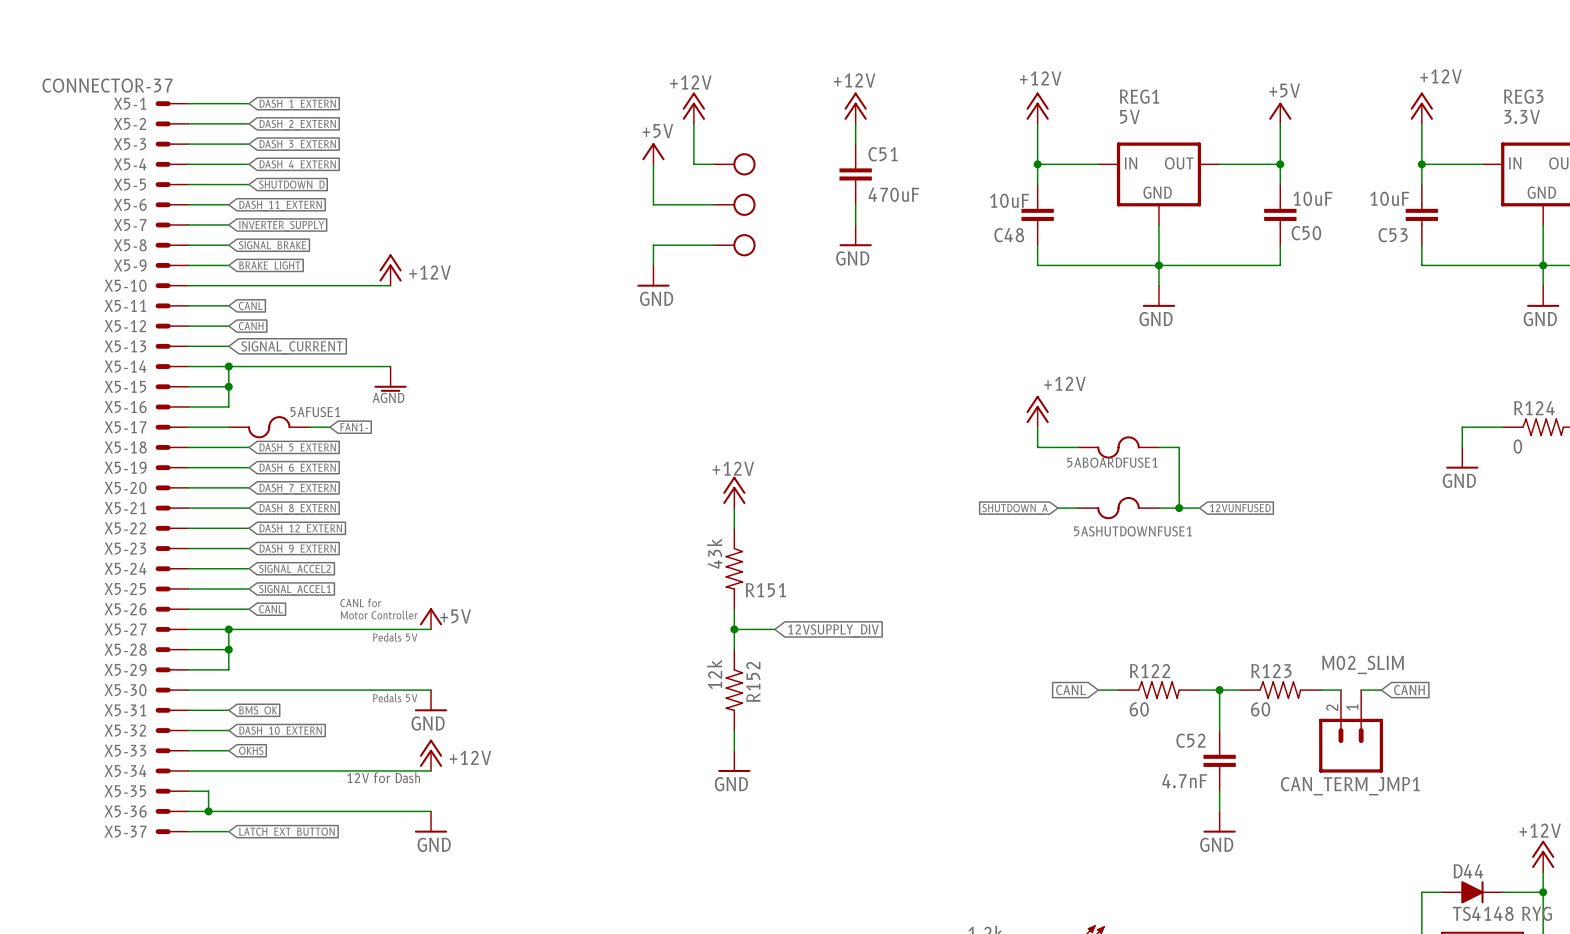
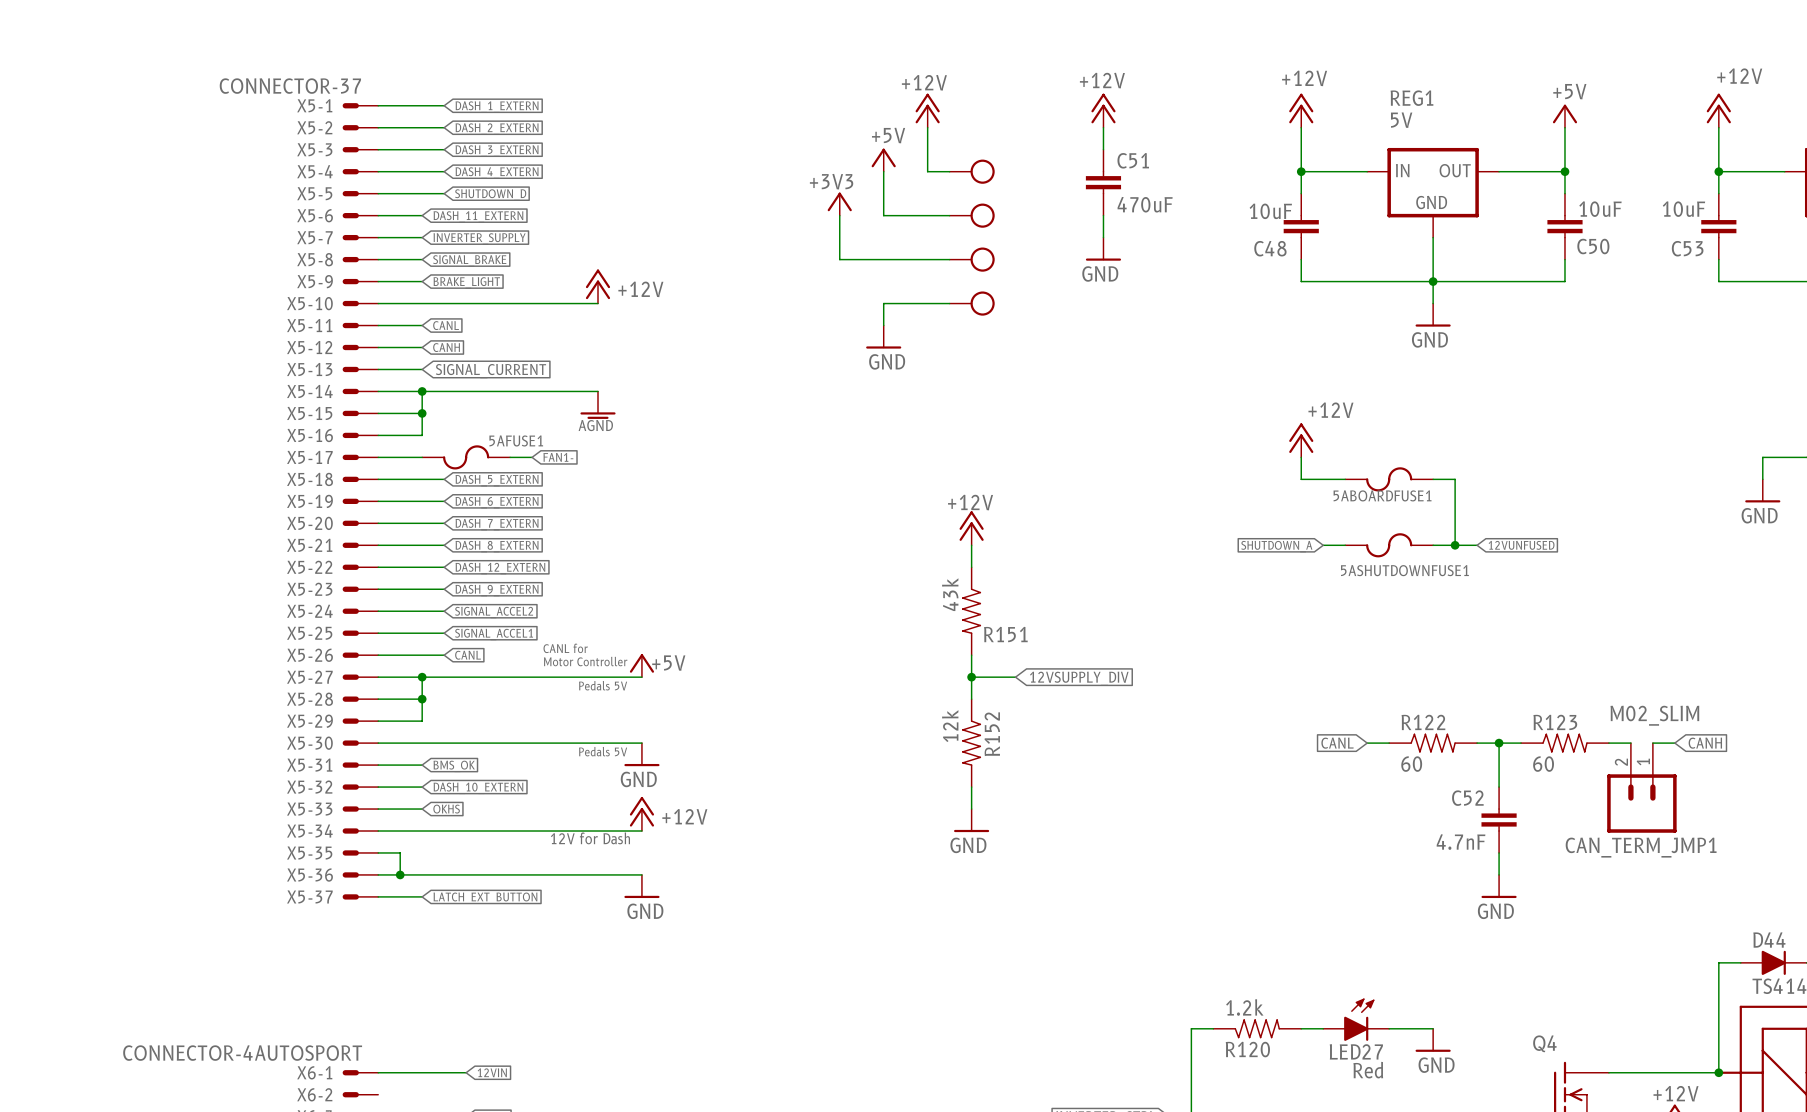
power symbol: none -> +3V3 (839, 204)
wire: (653, 245) (653, 265) -> (883, 259) (839, 259) (839, 215)
power symbol position: GND (653, 276) -> GND (883, 337)
wire: none -> (949, 303) (883, 303) (883, 325)
part: none -> (972, 303)

